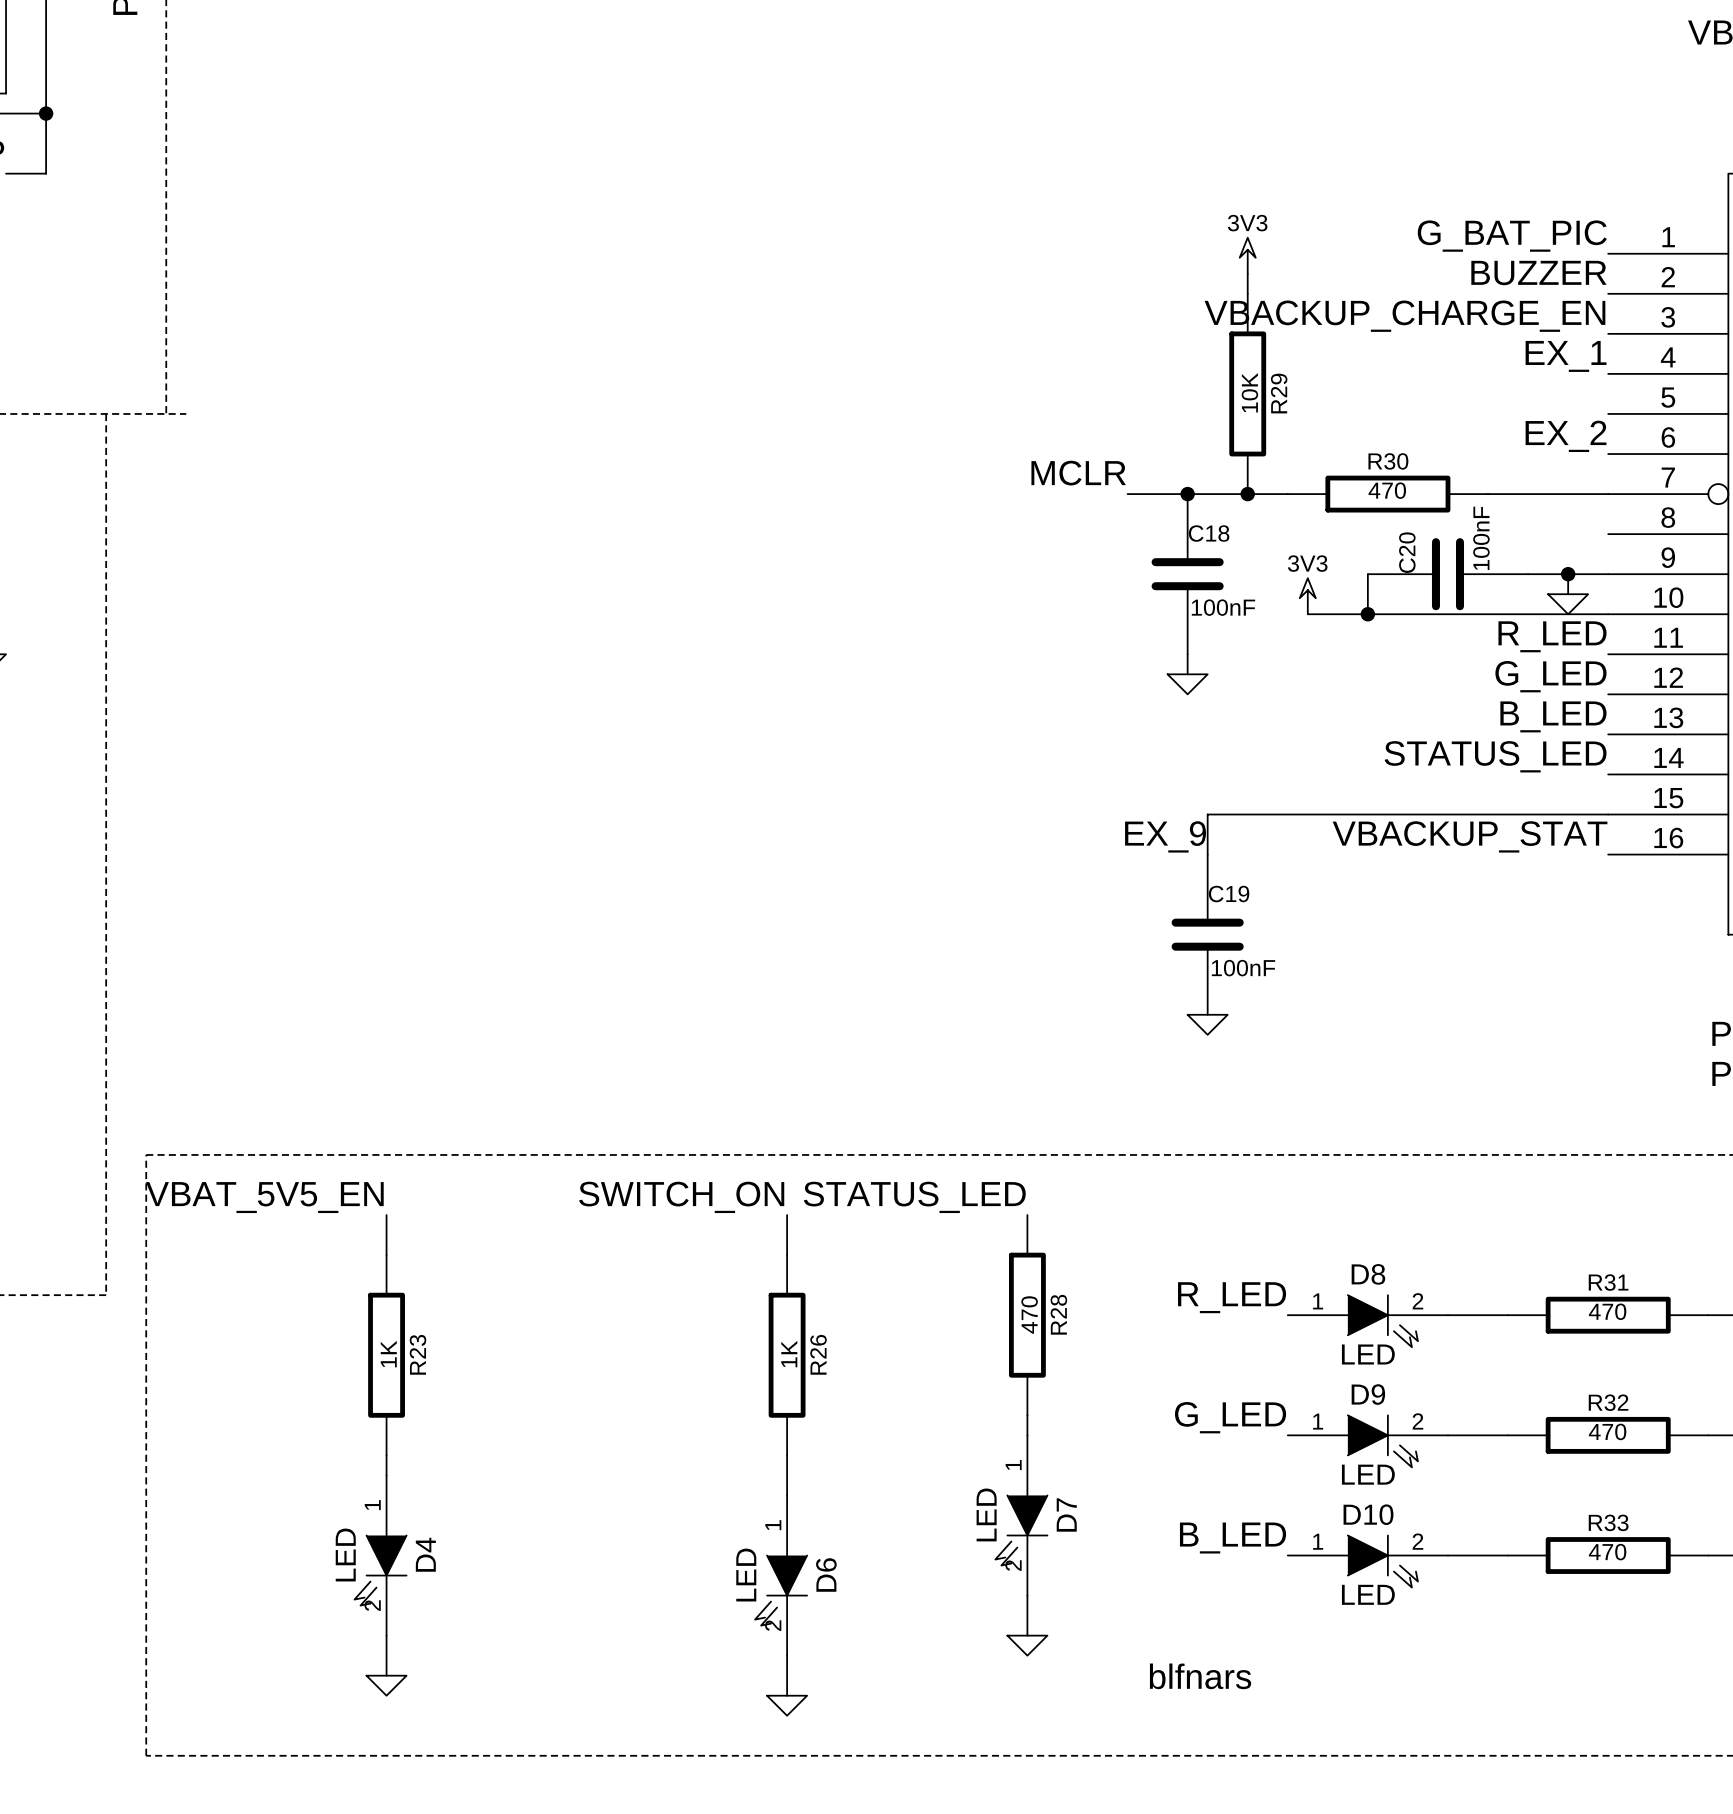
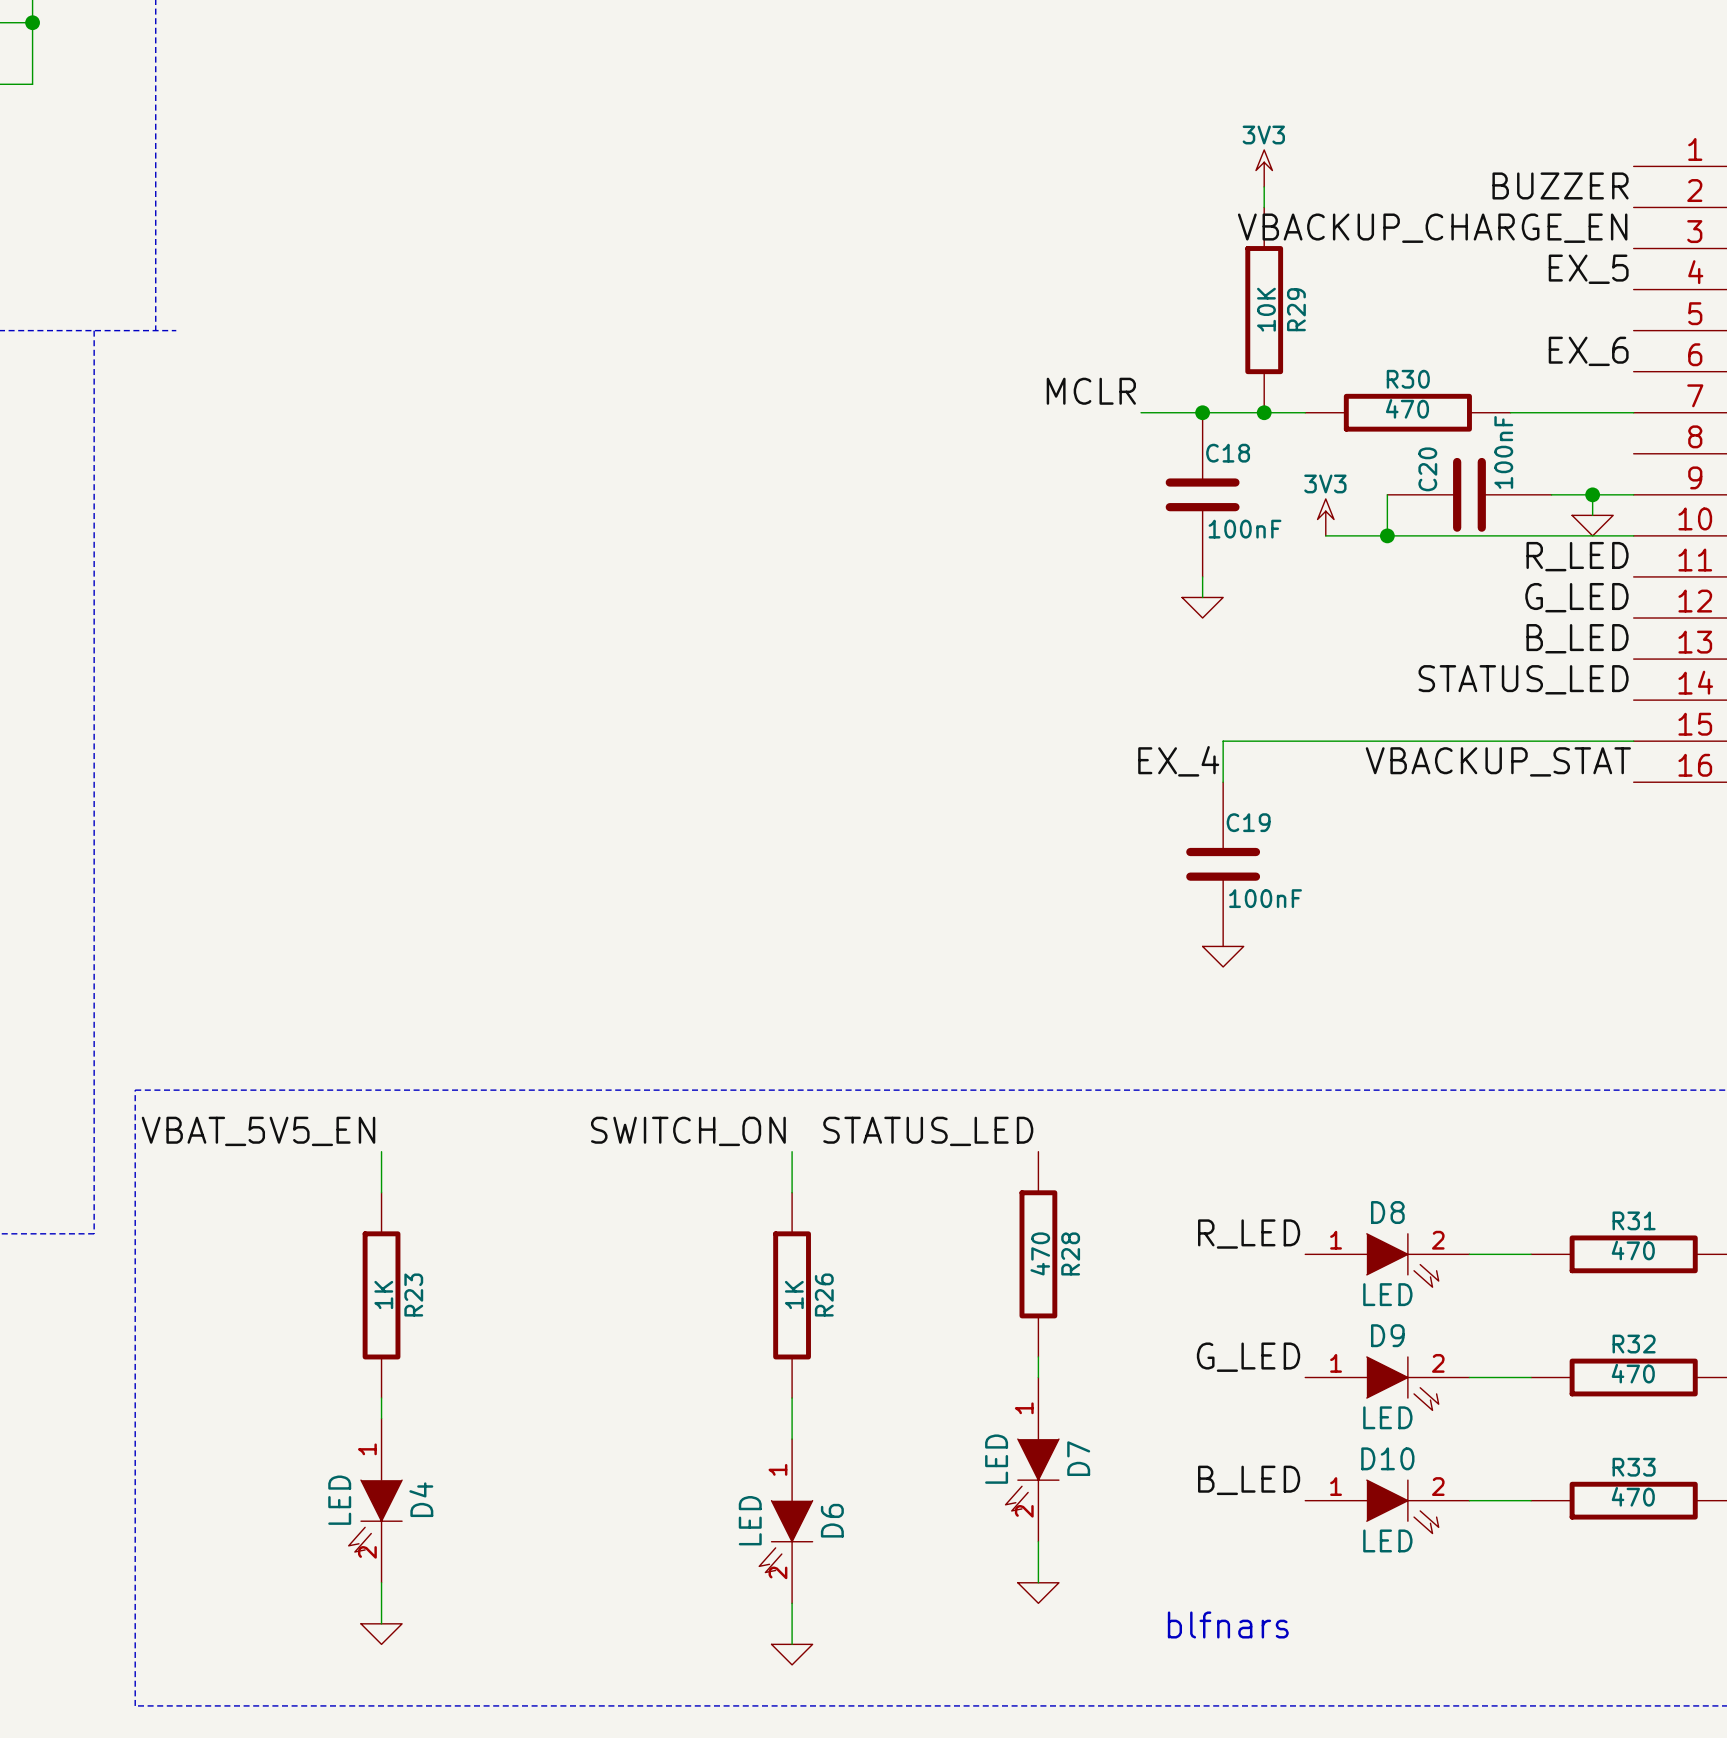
label: G_BAT_PIC (1512, 236) -> none
label: EX_1 (1566, 356) -> EX_5 (1588, 269)
label: EX_2 (1566, 436) -> EX_6 (1588, 351)
label: EX_9 (1165, 836) -> EX_4 (1178, 761)

